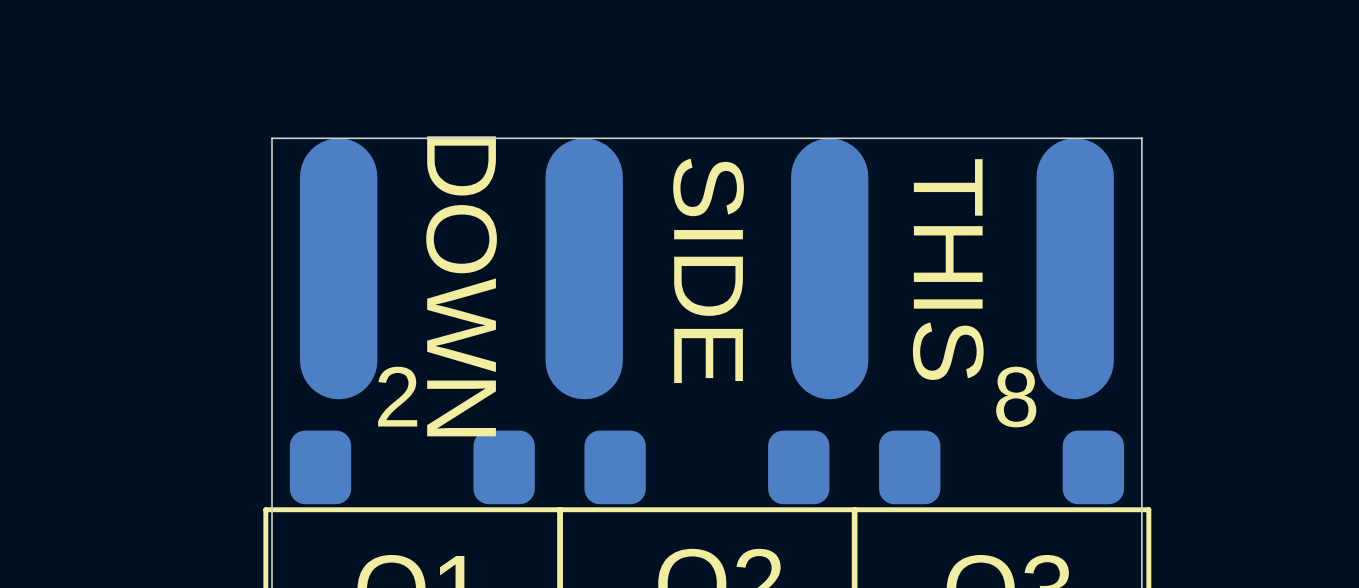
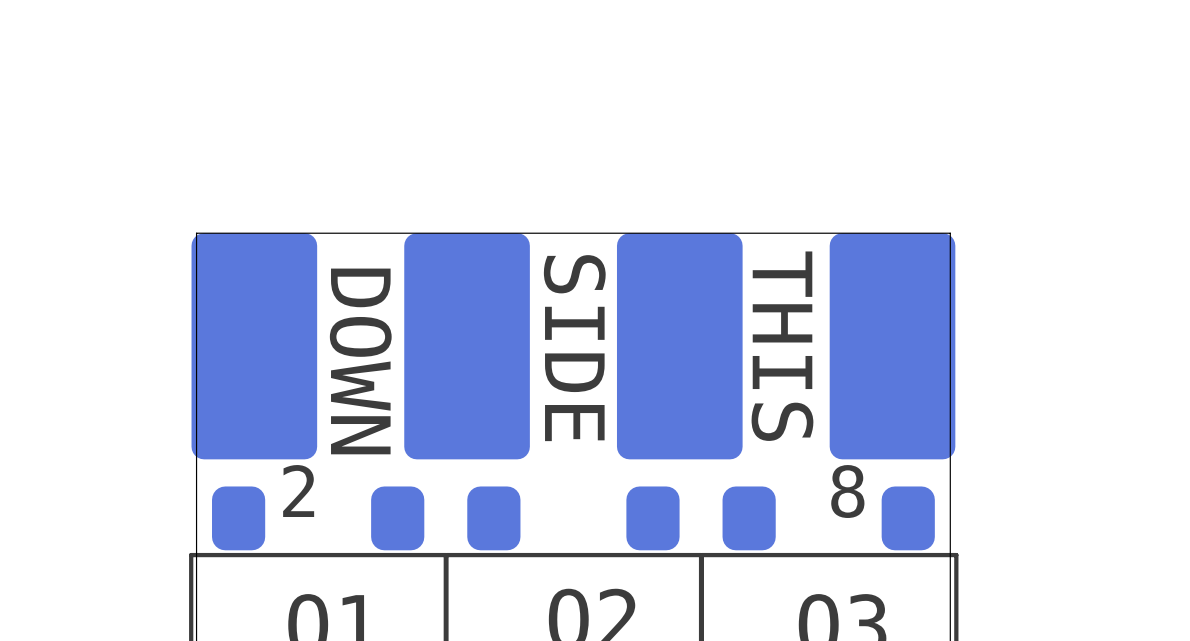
part footprint: [300, 138, 1114, 400] -> [191, 233, 956, 460]

